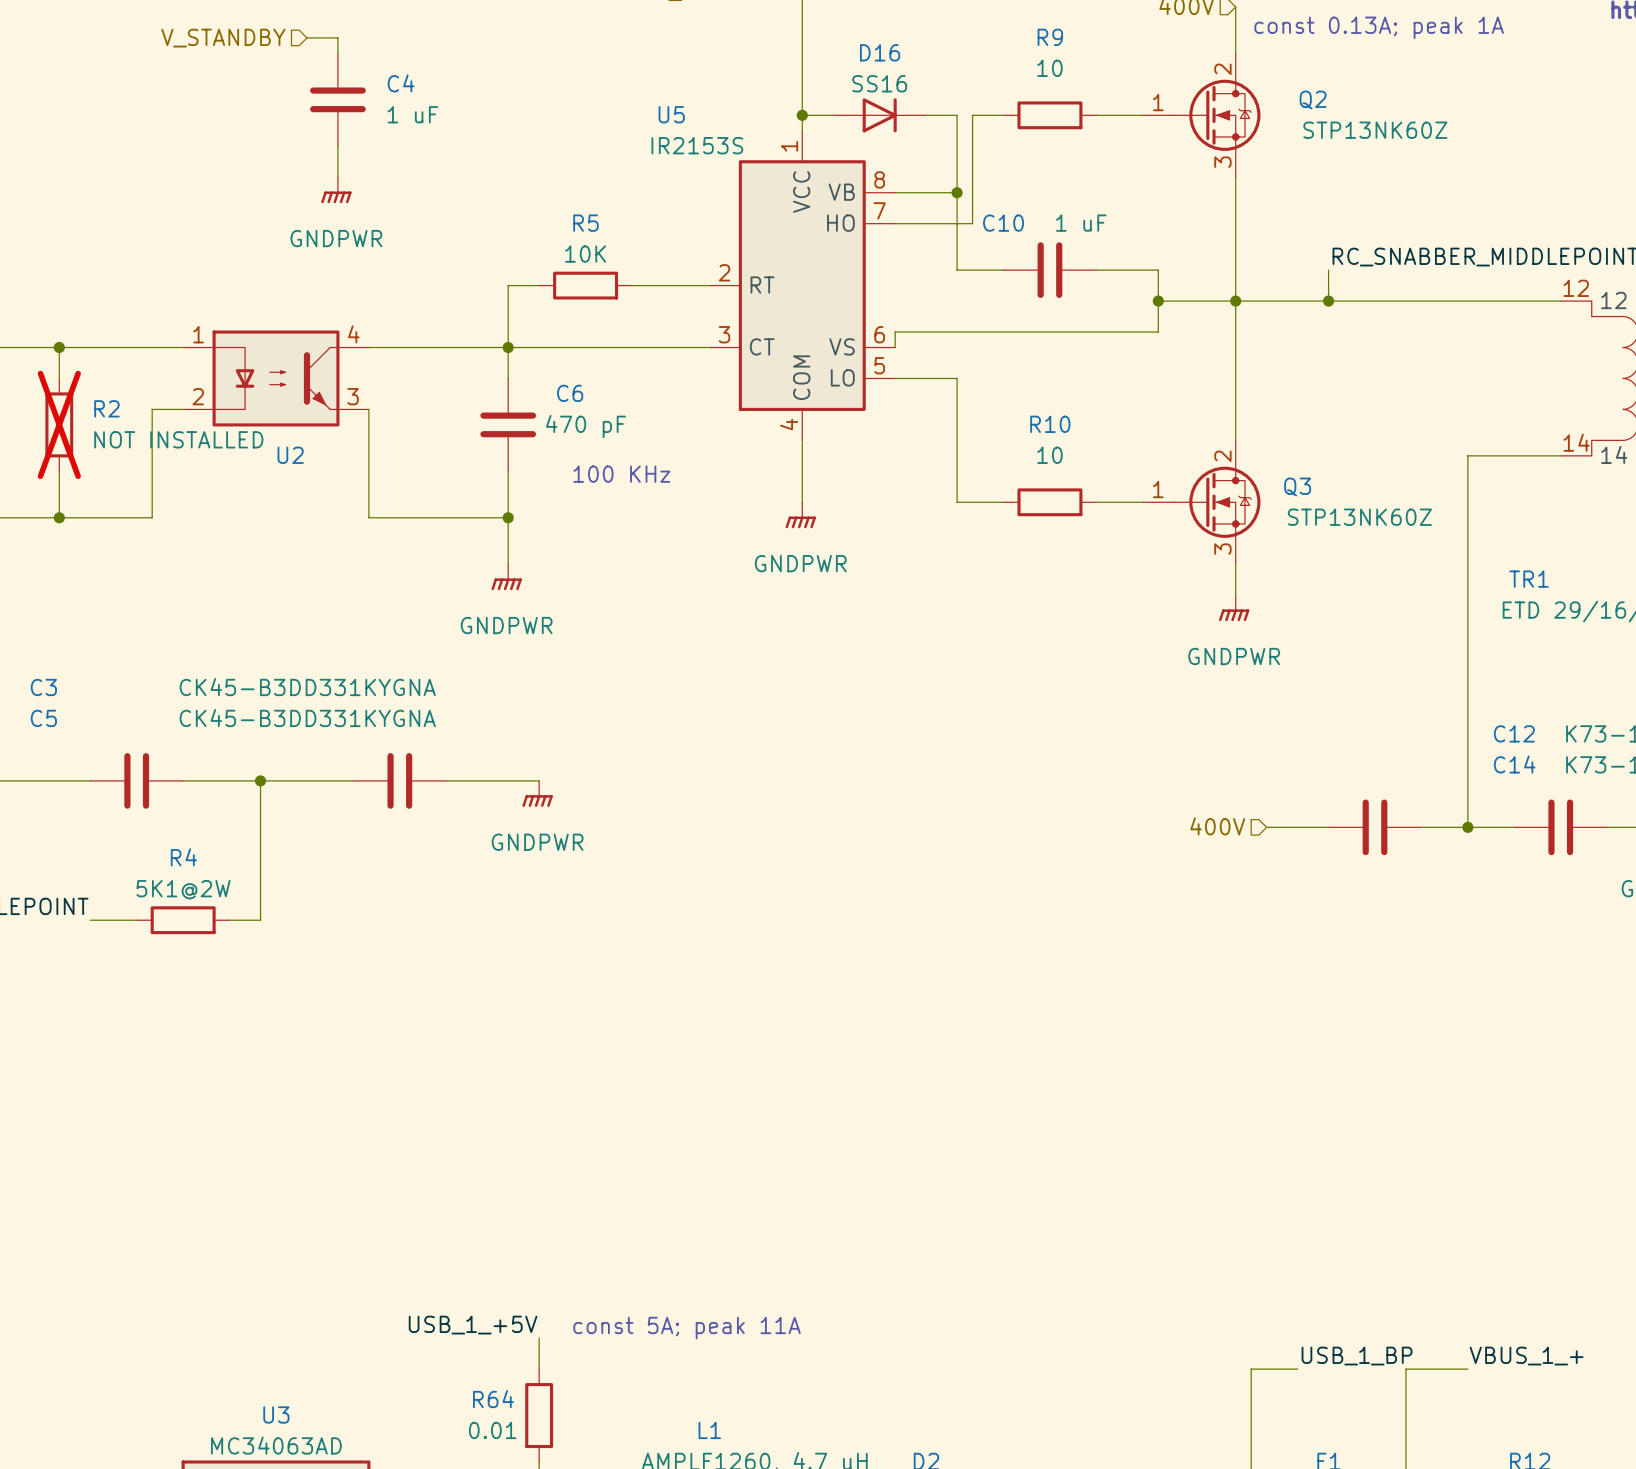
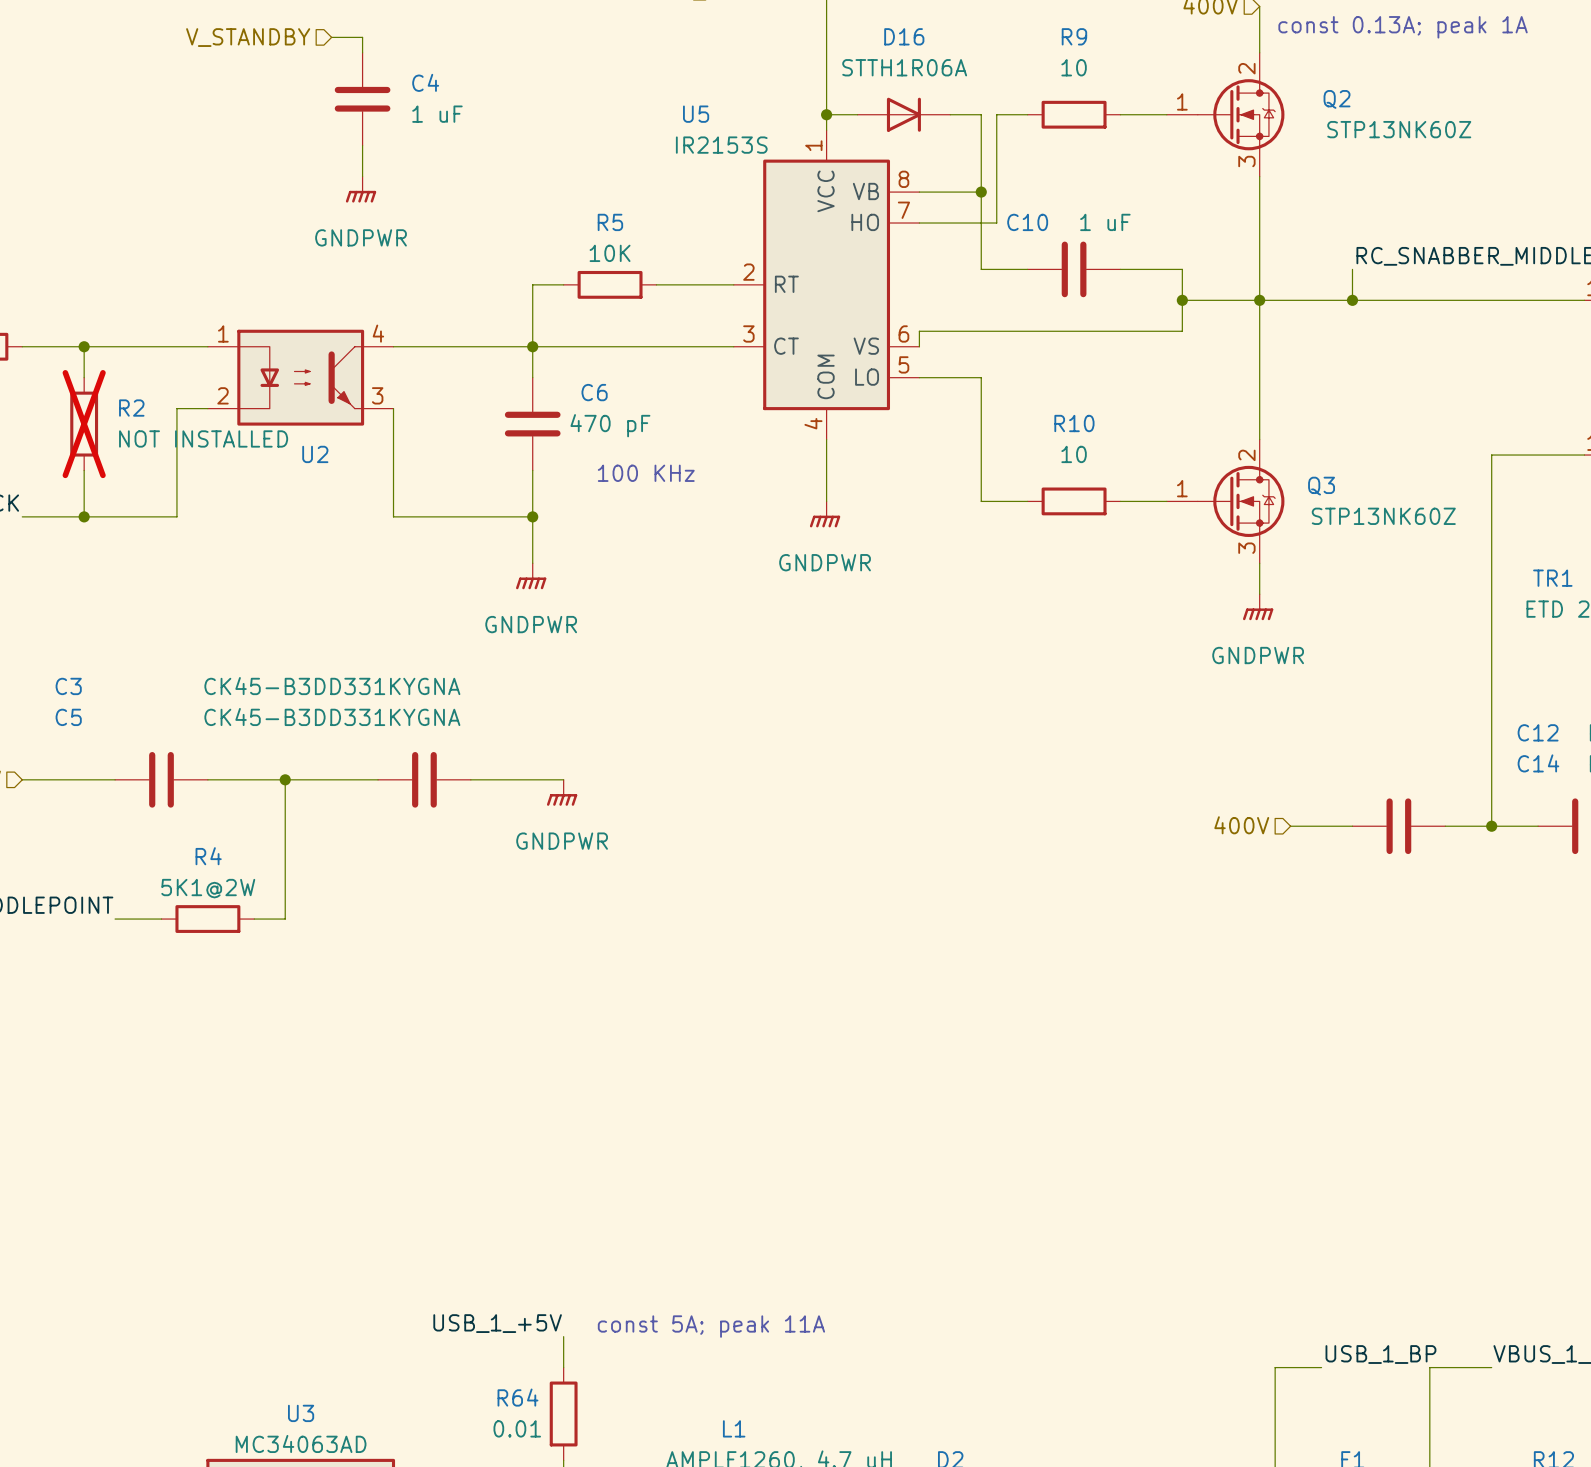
D16 name position: D16 (880, 52) -> D16 (904, 36)
D16 value: SS16 (879, 83) -> STTH1R06A (904, 67)

